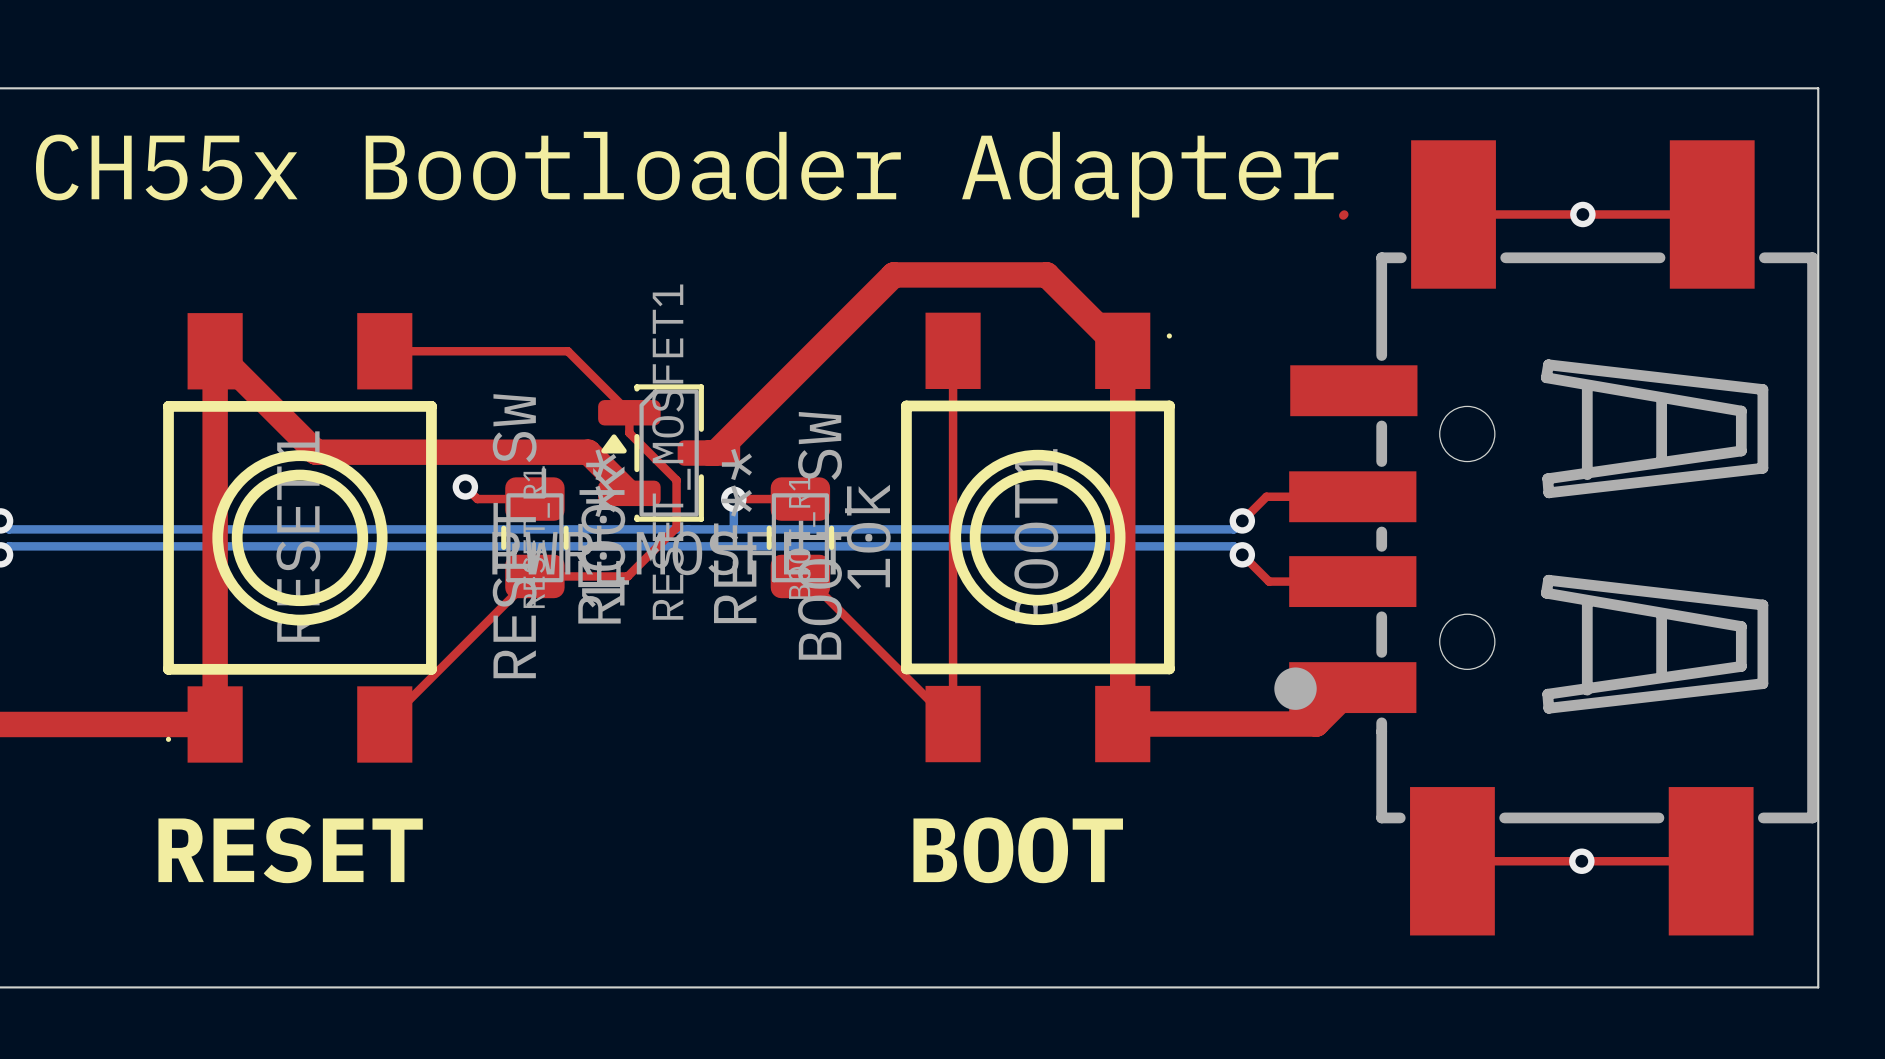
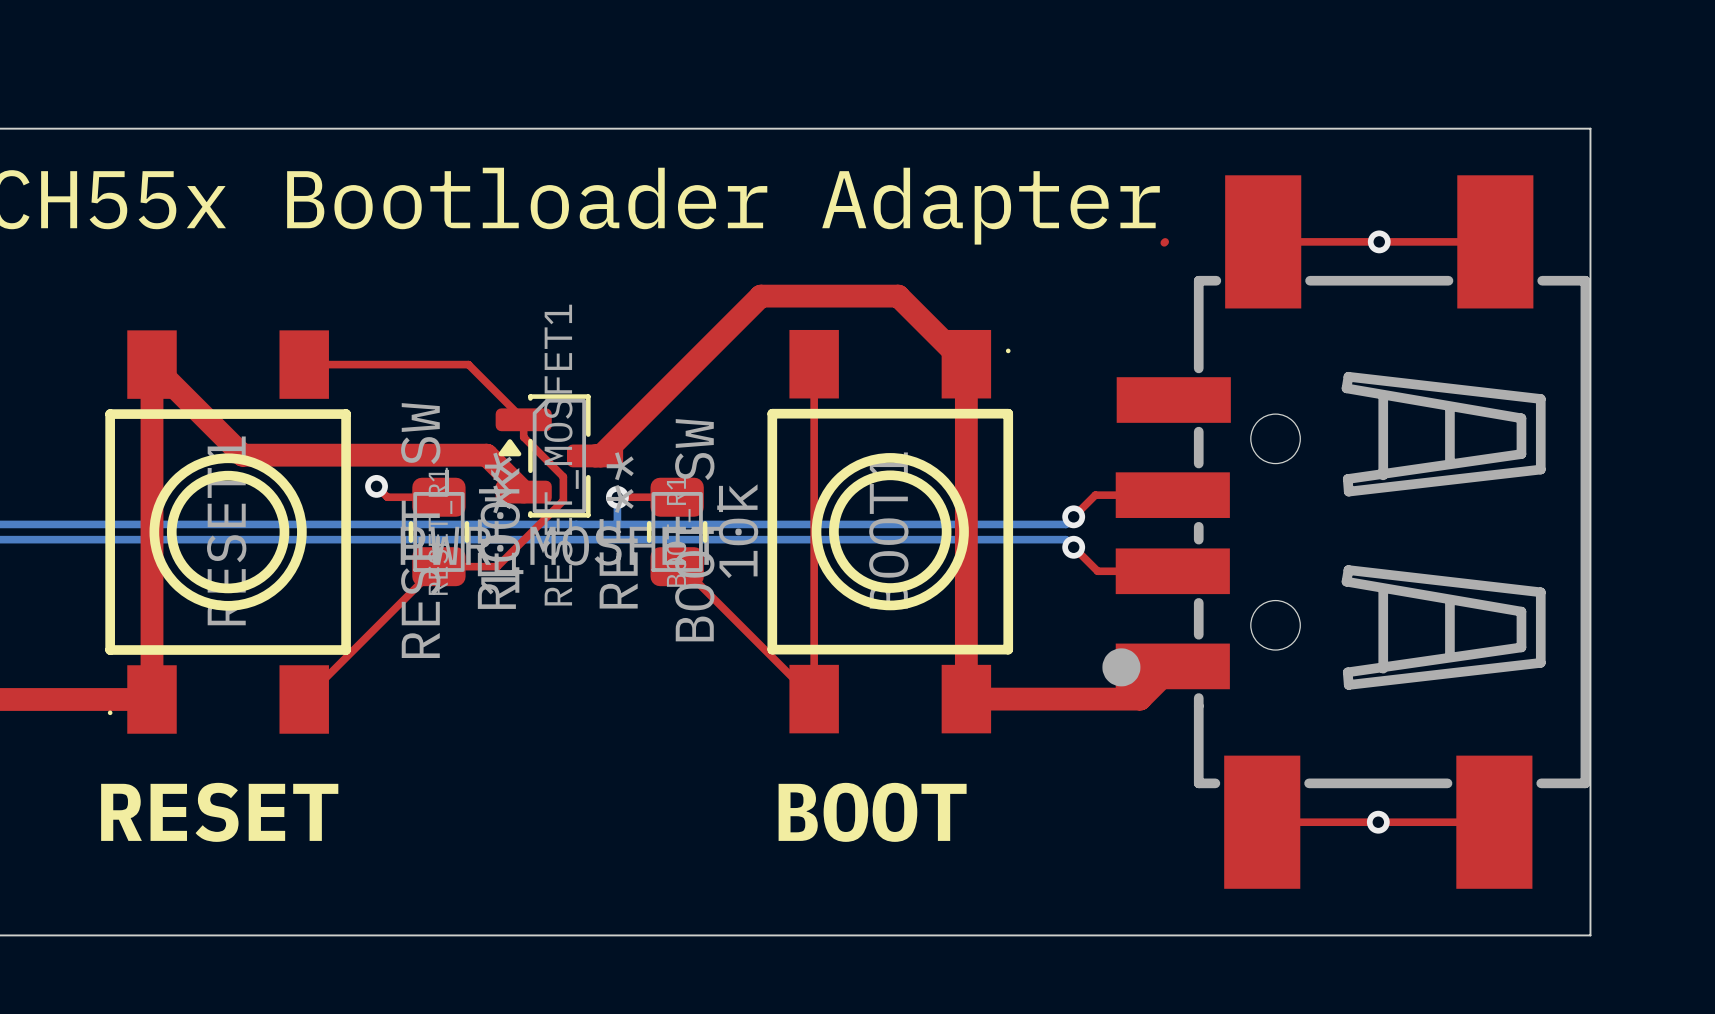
top track: (629, 433) (676, 480) (676, 527) (627, 576) (599, 576) -> (523, 437) (563, 476) (563, 500) (497, 566)

